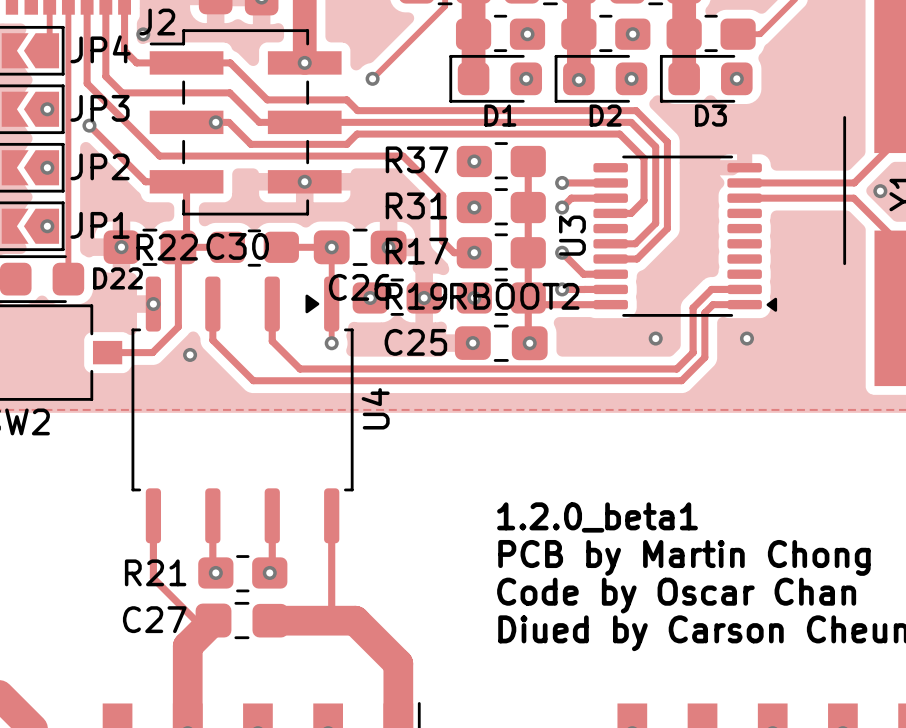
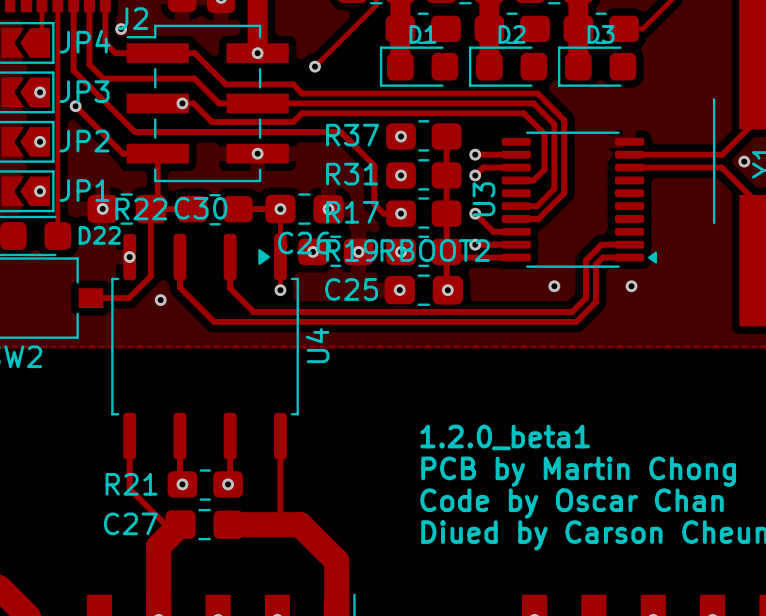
via: (527, 34) -> none
via: (632, 34) -> none
via: (526, 78) -> none
via: (631, 78) -> none
via: (736, 78) -> none
via: (578, 80) -> none
D1 name position: D1 (500, 115) -> D1 (423, 34)
D2 name position: D2 (605, 115) -> D2 (512, 34)
D3 name position: D3 (710, 115) -> D3 (601, 34)

